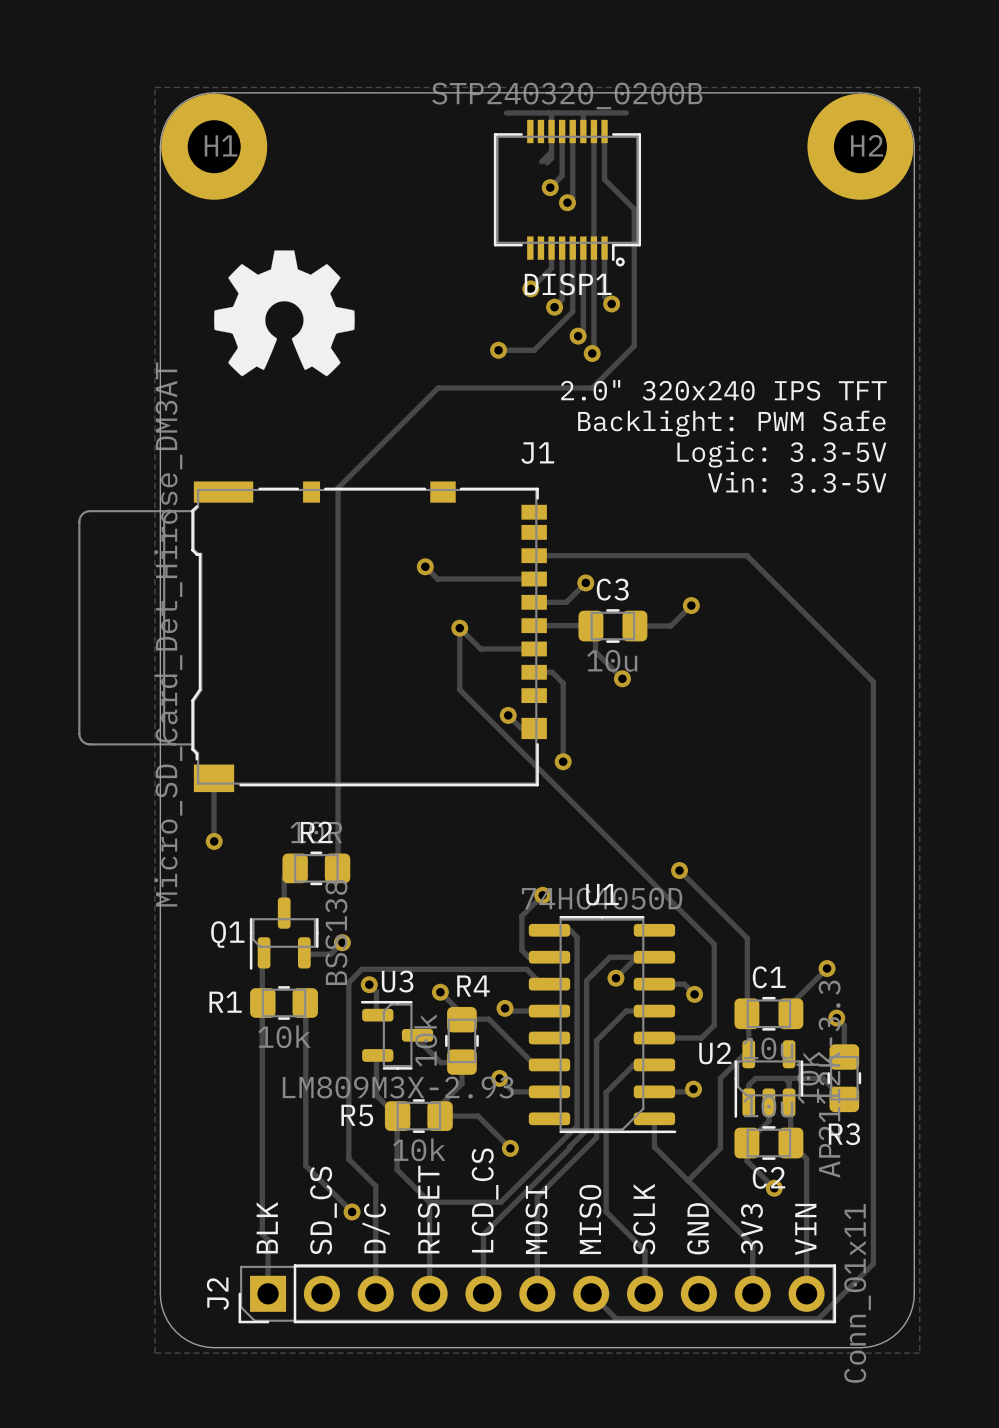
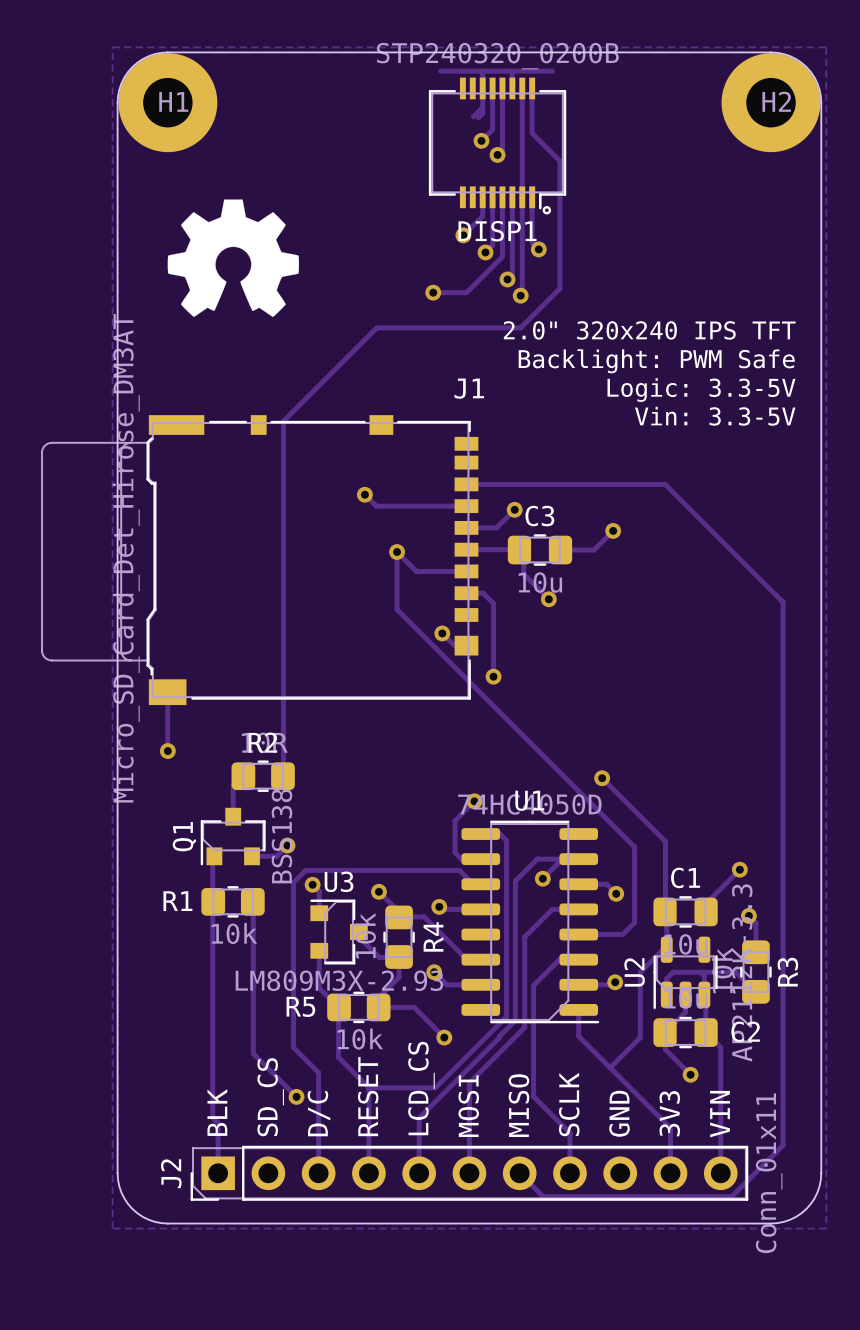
Q1 footprint: [249, 897, 319, 970] -> [200, 807, 266, 866]
Q1 name rotation: 0° (227, 934) -> 90° counterclockwise (184, 836)
R4 name rotation: 0° (473, 986) -> 90° counterclockwise (433, 936)
R4 name position: R4 (473, 986) -> R4 (433, 936)
U3 footprint: [360, 1000, 434, 1070] -> [310, 899, 368, 965]
U2 name rotation: 0° (715, 1053) -> 90° counterclockwise (634, 972)
R3 name rotation: 0° (844, 1134) -> 90° counterclockwise (787, 972)
R3 name position: R3 (844, 1134) -> R3 (787, 972)
C2 name position: C2 (769, 1177) -> C2 (745, 1031)

